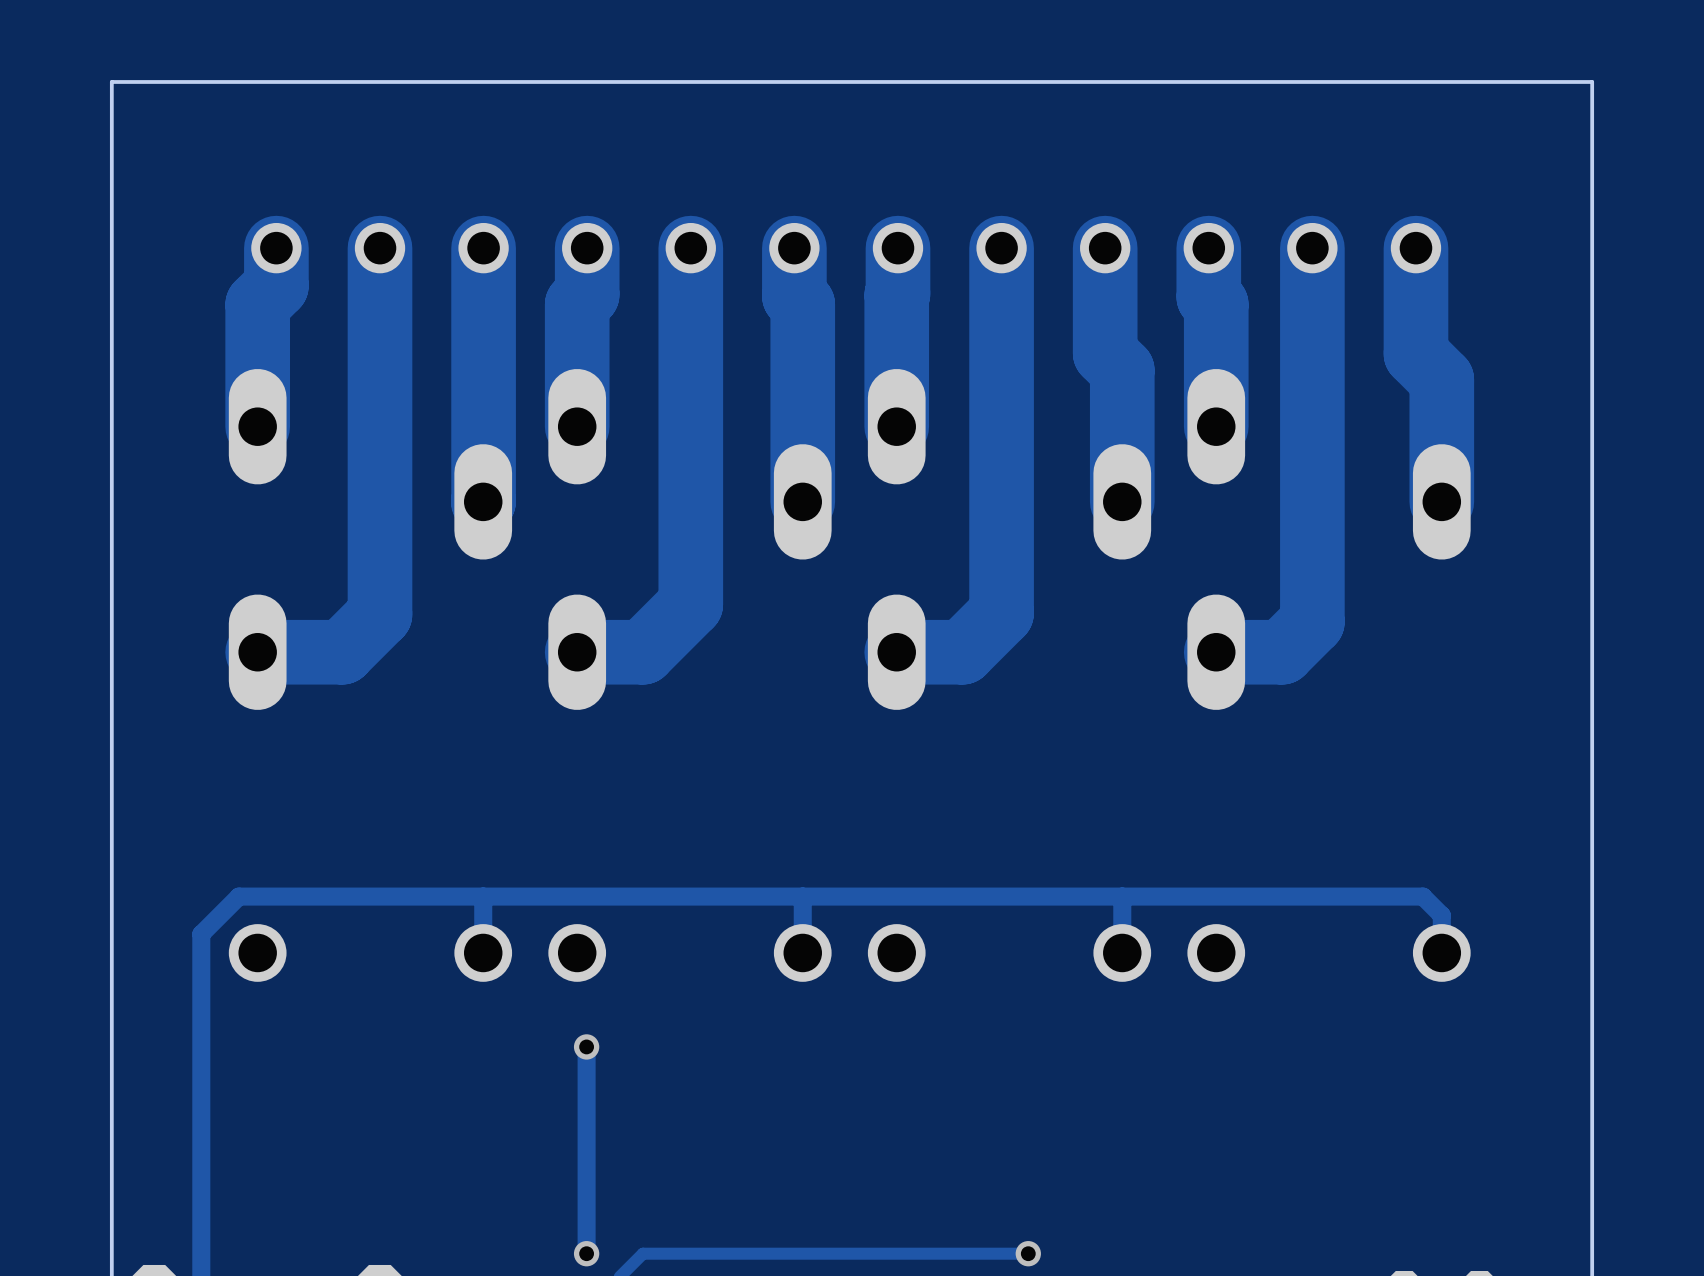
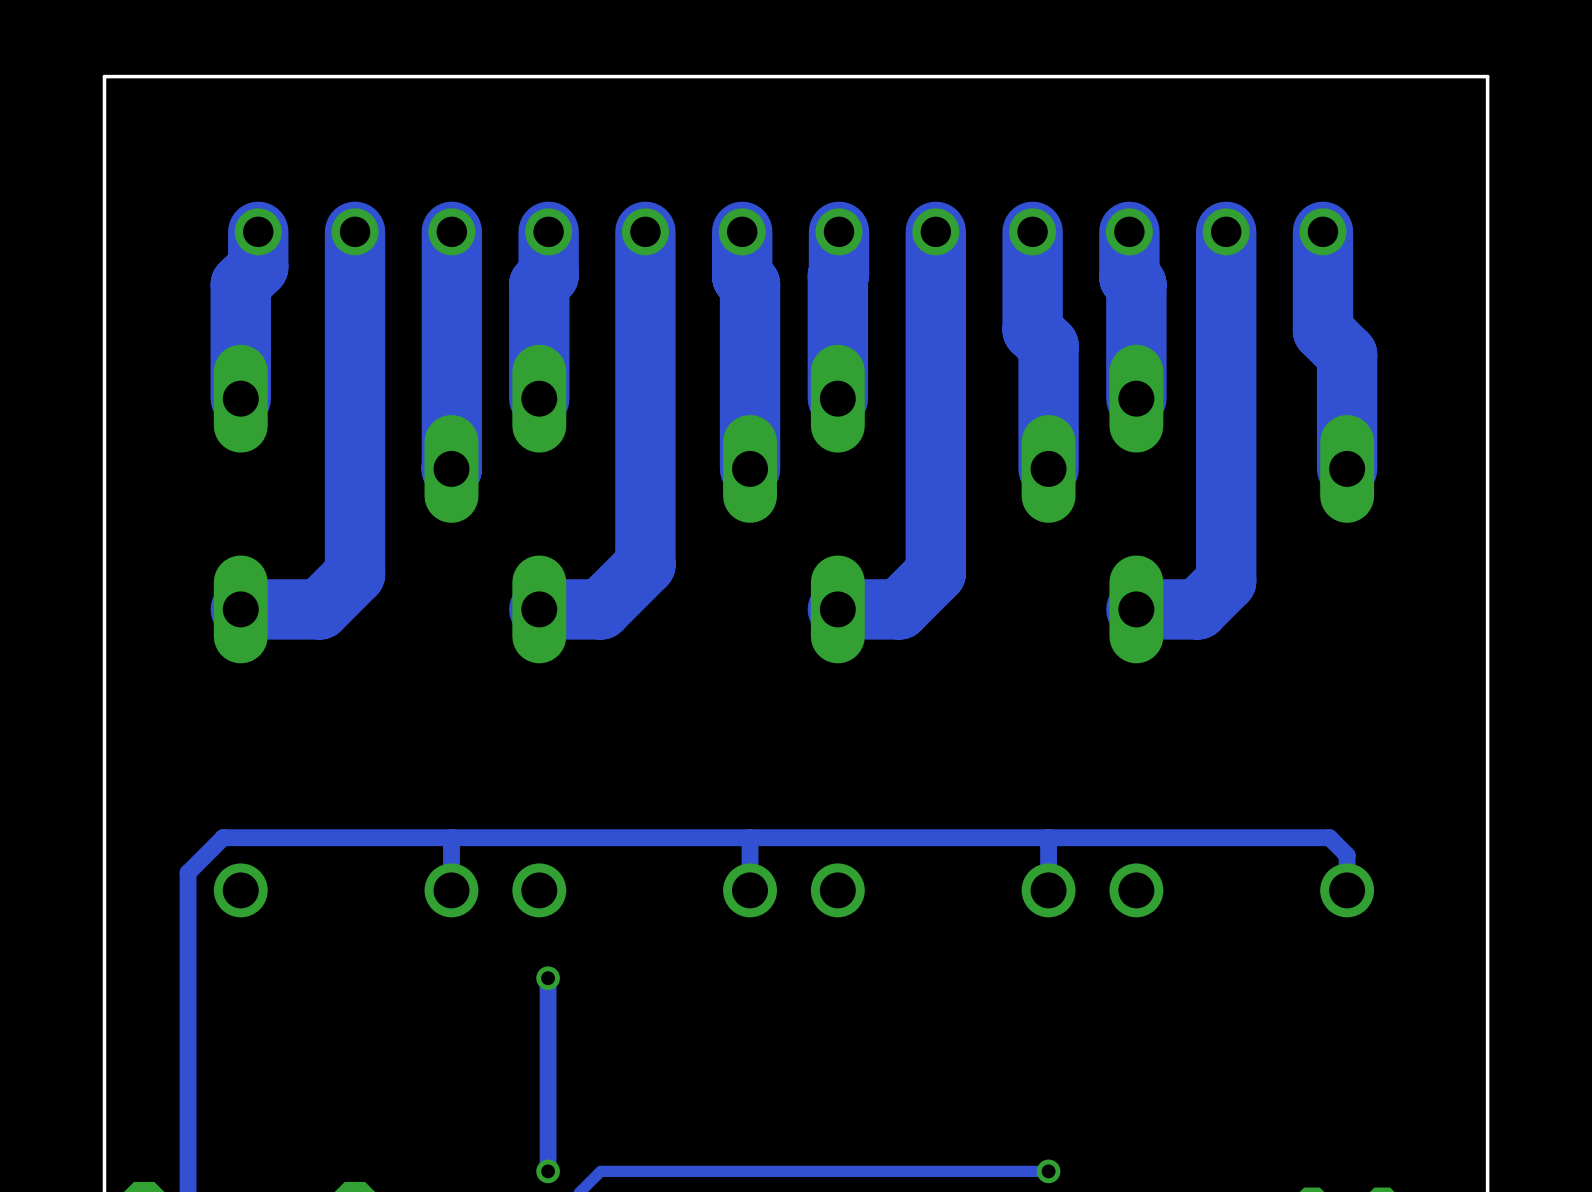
via: (1028, 1253) -> none
track: none -> (1048, 1171) (960, 1171)
via: none -> (1048, 1171)

